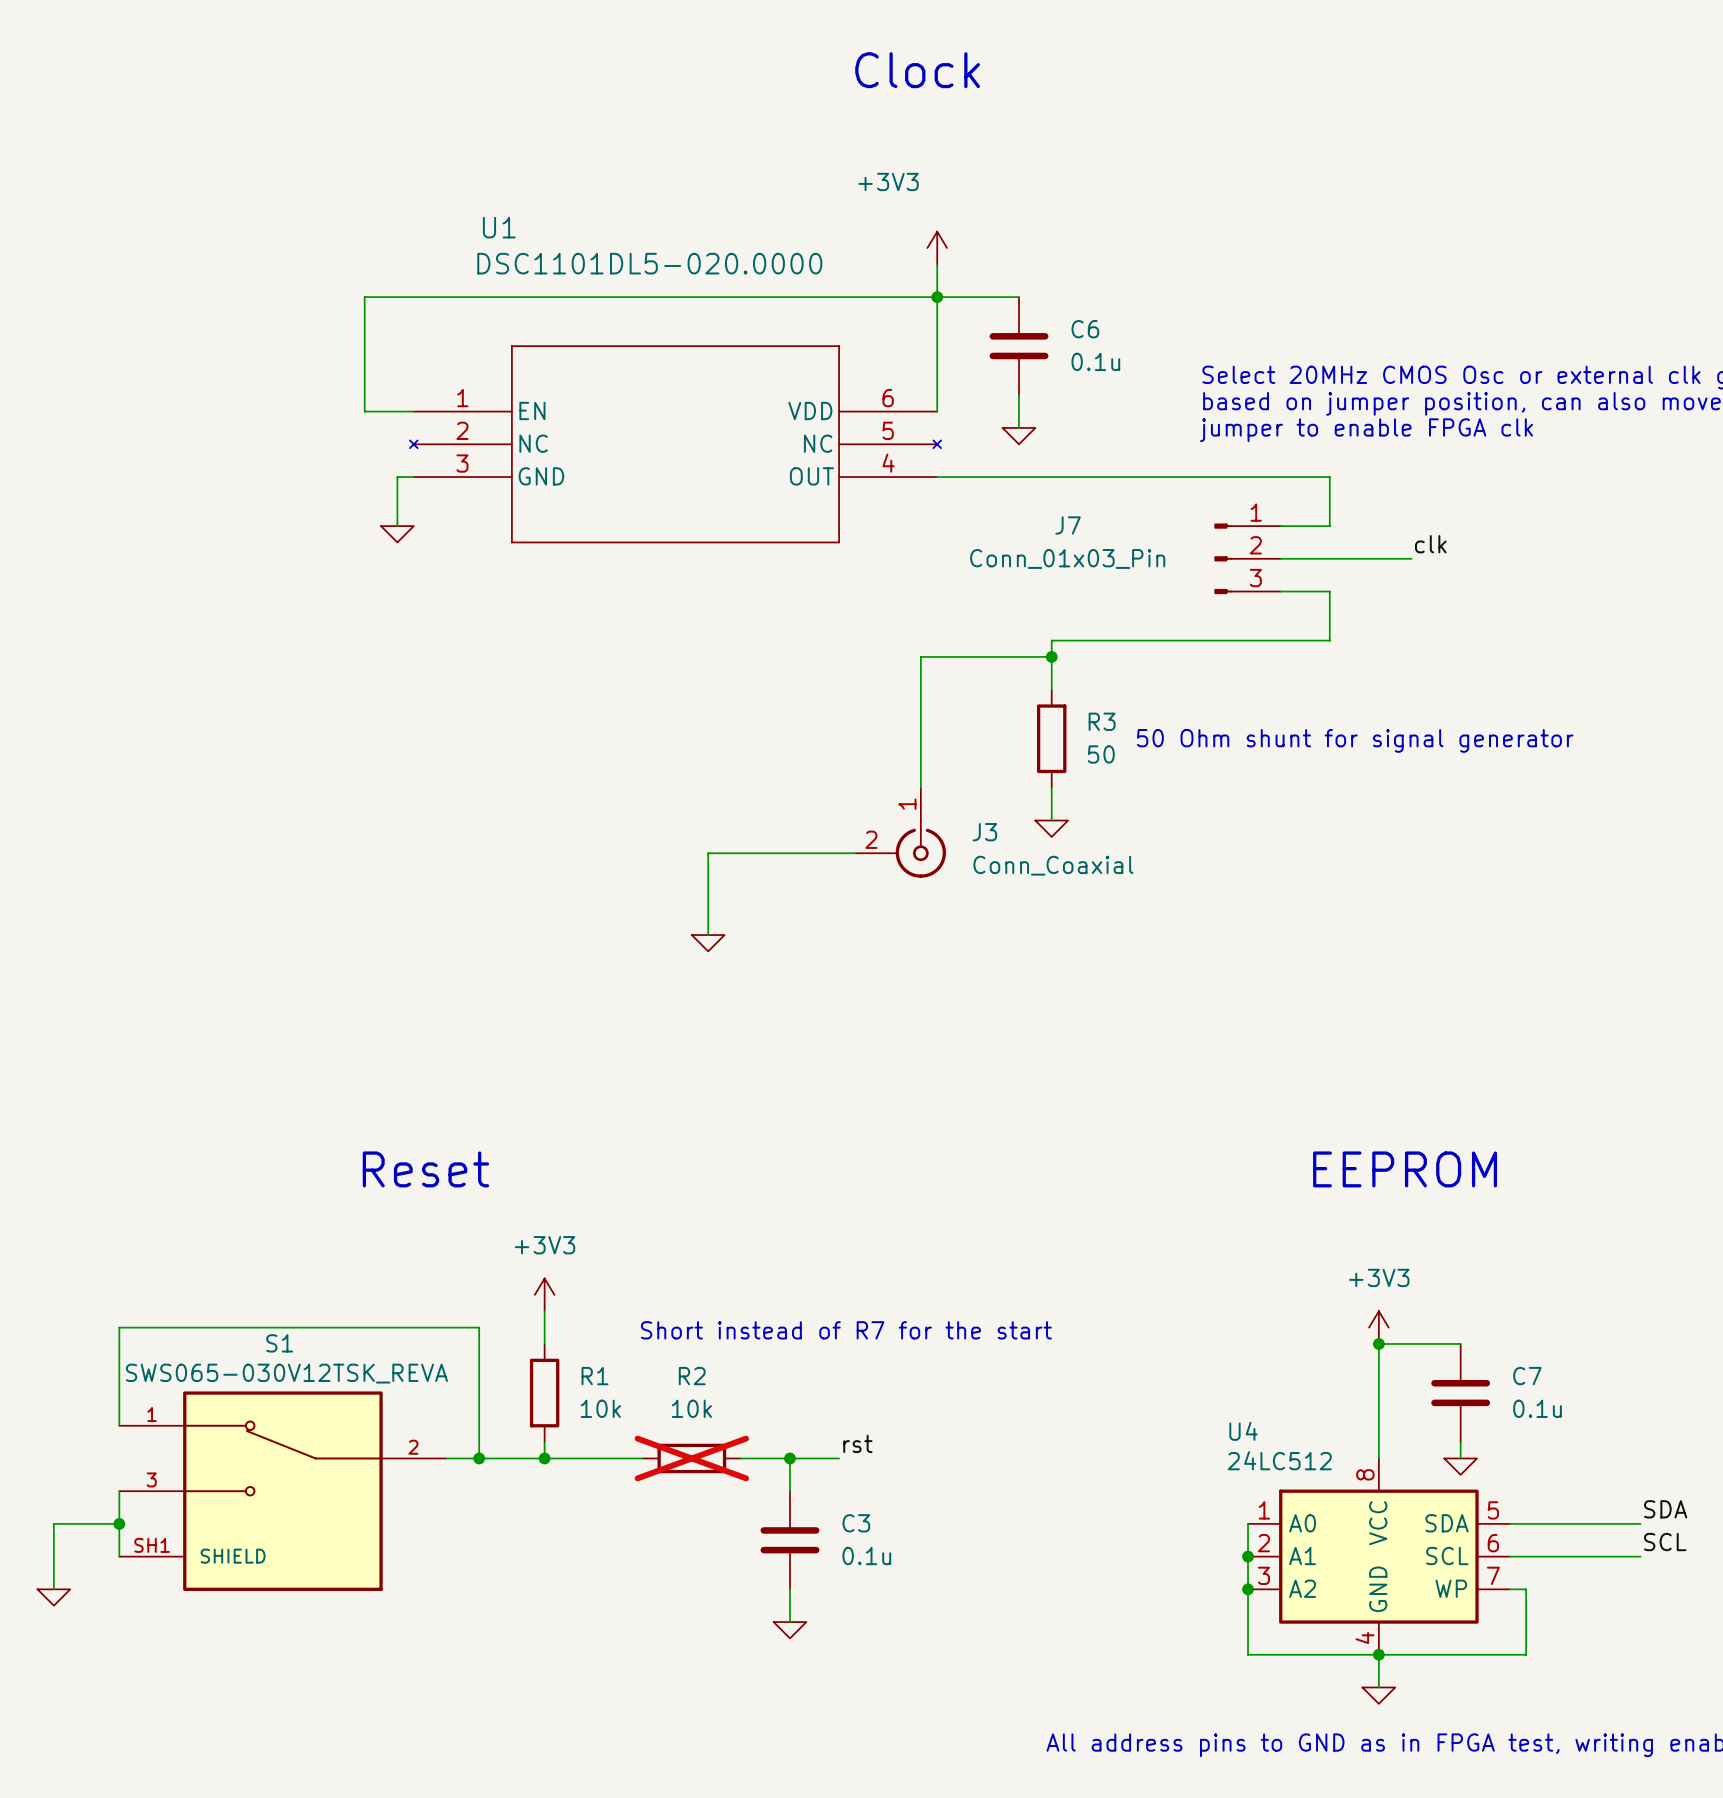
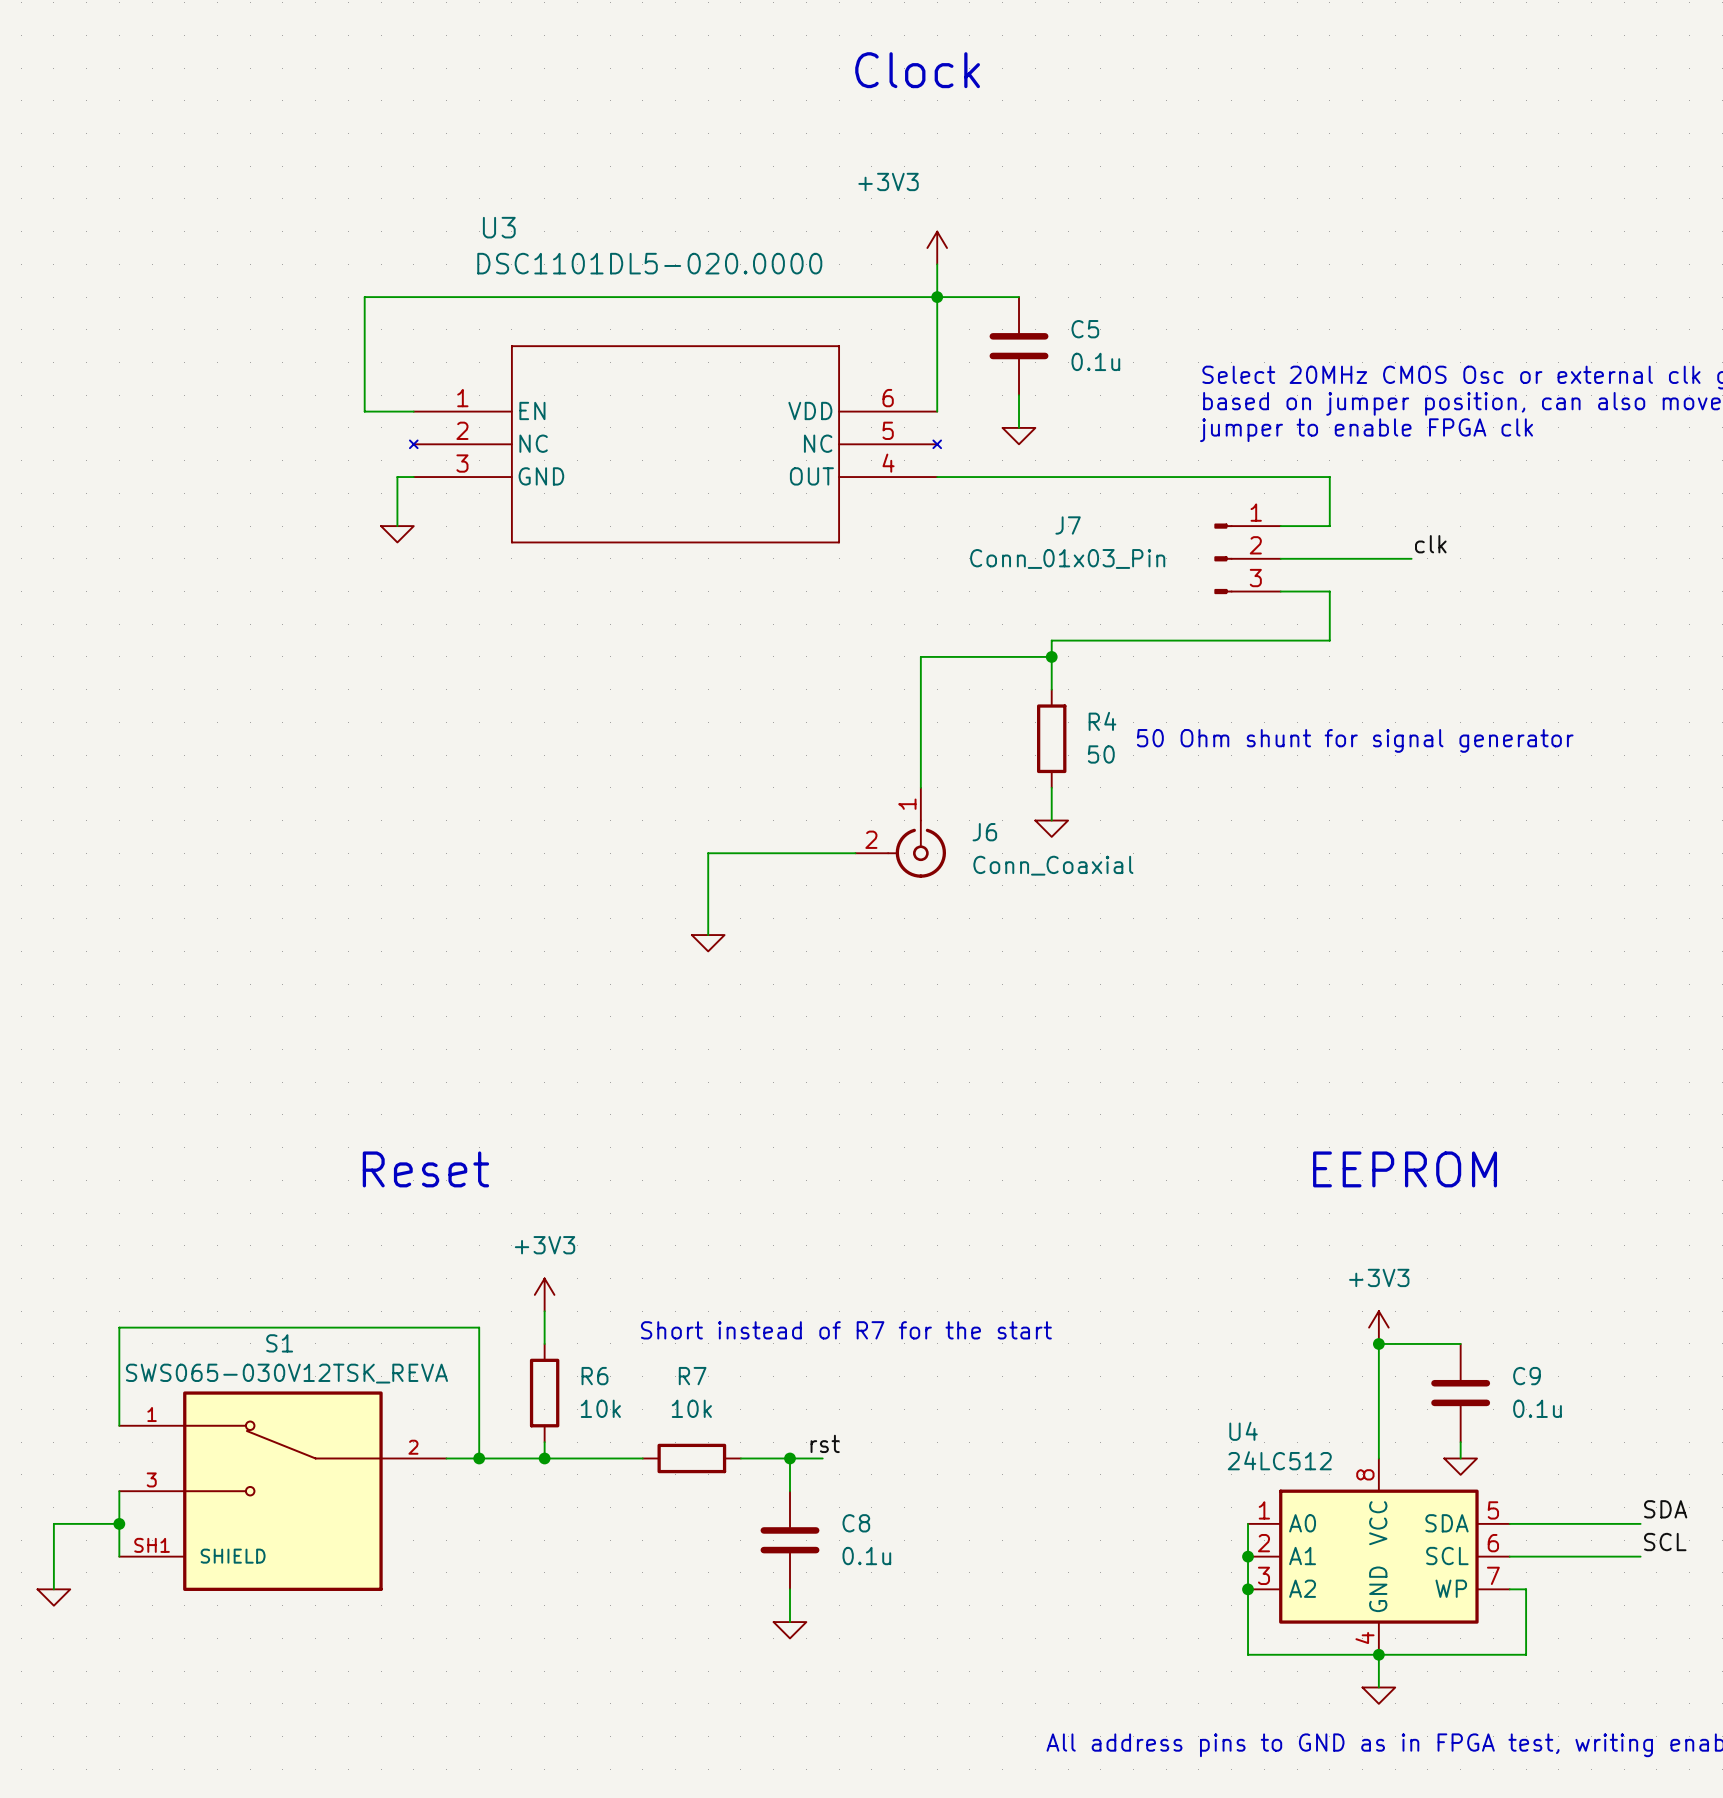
U1 name: U1 (499, 227) -> U3 (499, 227)
C6 name: C6 (1085, 329) -> C5 (1085, 329)
R3 name: R3 (1102, 721) -> R4 (1102, 721)
J3 name: J3 (984, 832) -> J6 (984, 832)
R1 name: R1 (594, 1376) -> R6 (594, 1376)
R2 name: R2 (692, 1376) -> R7 (692, 1376)
C7 name: C7 (1527, 1376) -> C9 (1526, 1376)
label position: rst (857, 1443) -> rst (825, 1443)
R2 do-not-place cross: (691, 1458) -> none
wire: (822, 1458) (839, 1458) -> none
C3 name: C3 (856, 1523) -> C8 (856, 1523)

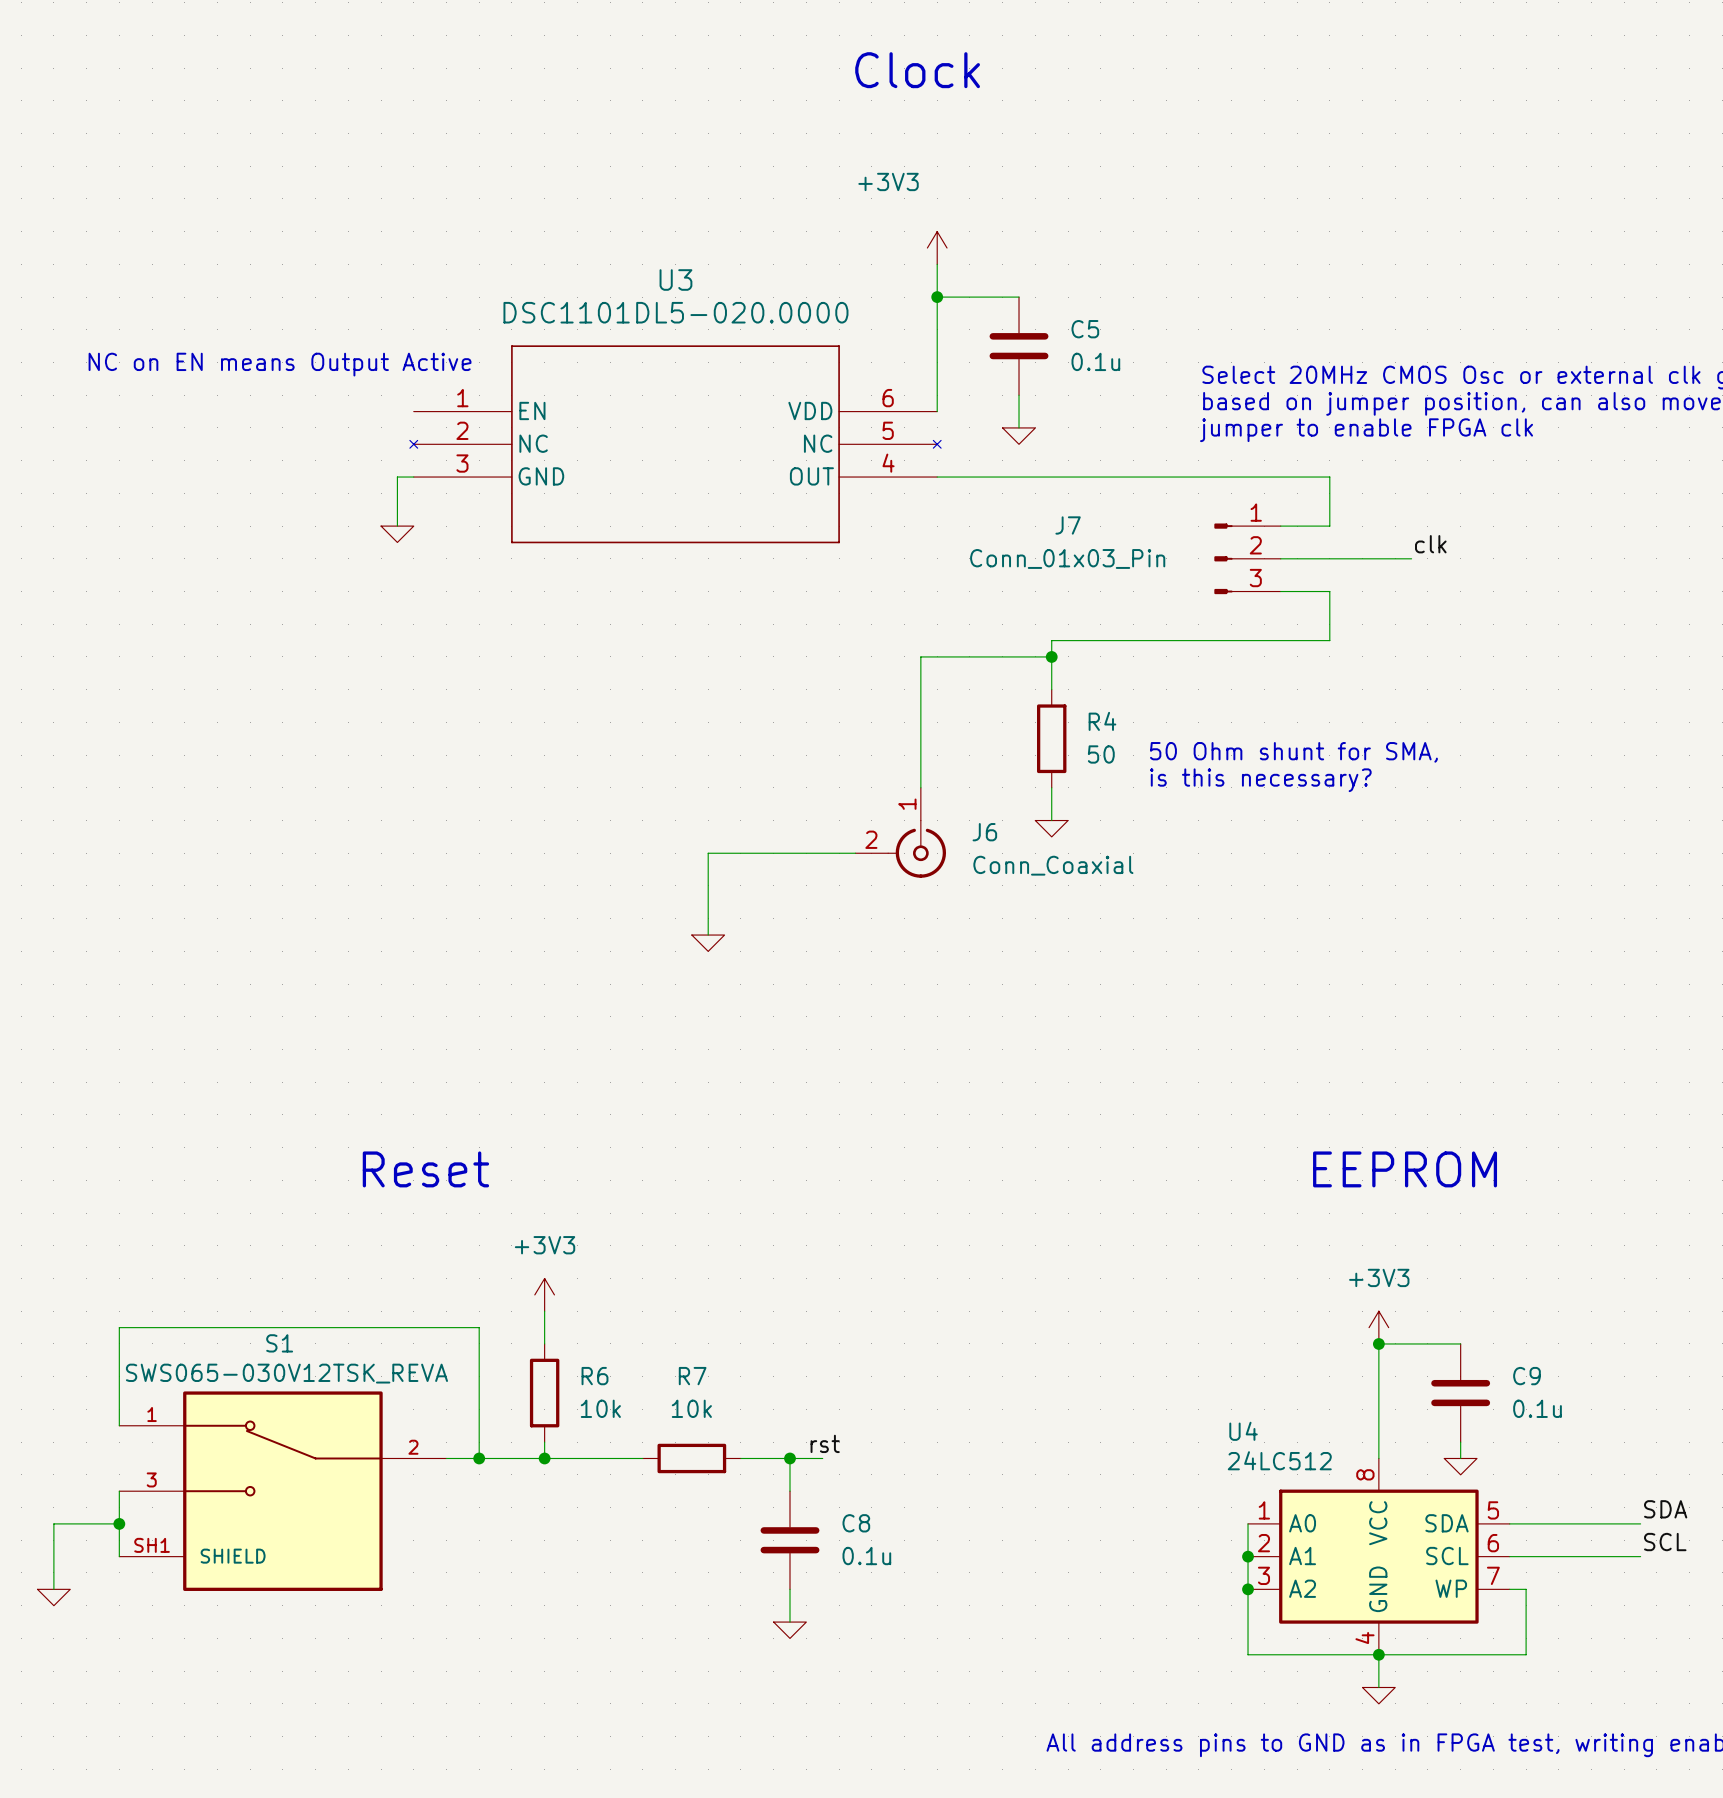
U3 name position: U3 (499, 227) -> U3 (675, 279)
U3 value position: DSC1101DL5-020.0000 (649, 263) -> DSC1101DL5-020.0000 (675, 312)
wire: (937, 297) (364, 297) (364, 411) (413, 411) -> none
text: none -> NC on EN means Output Active (280, 364)
text: 50 Ohm shunt for signal generator (1355, 740) -> 50 Ohm shunt for SMA, (1293, 752)
text: none -> is this necessary? (1260, 780)
text: Short instead of R7 for the start (846, 1330) -> none

